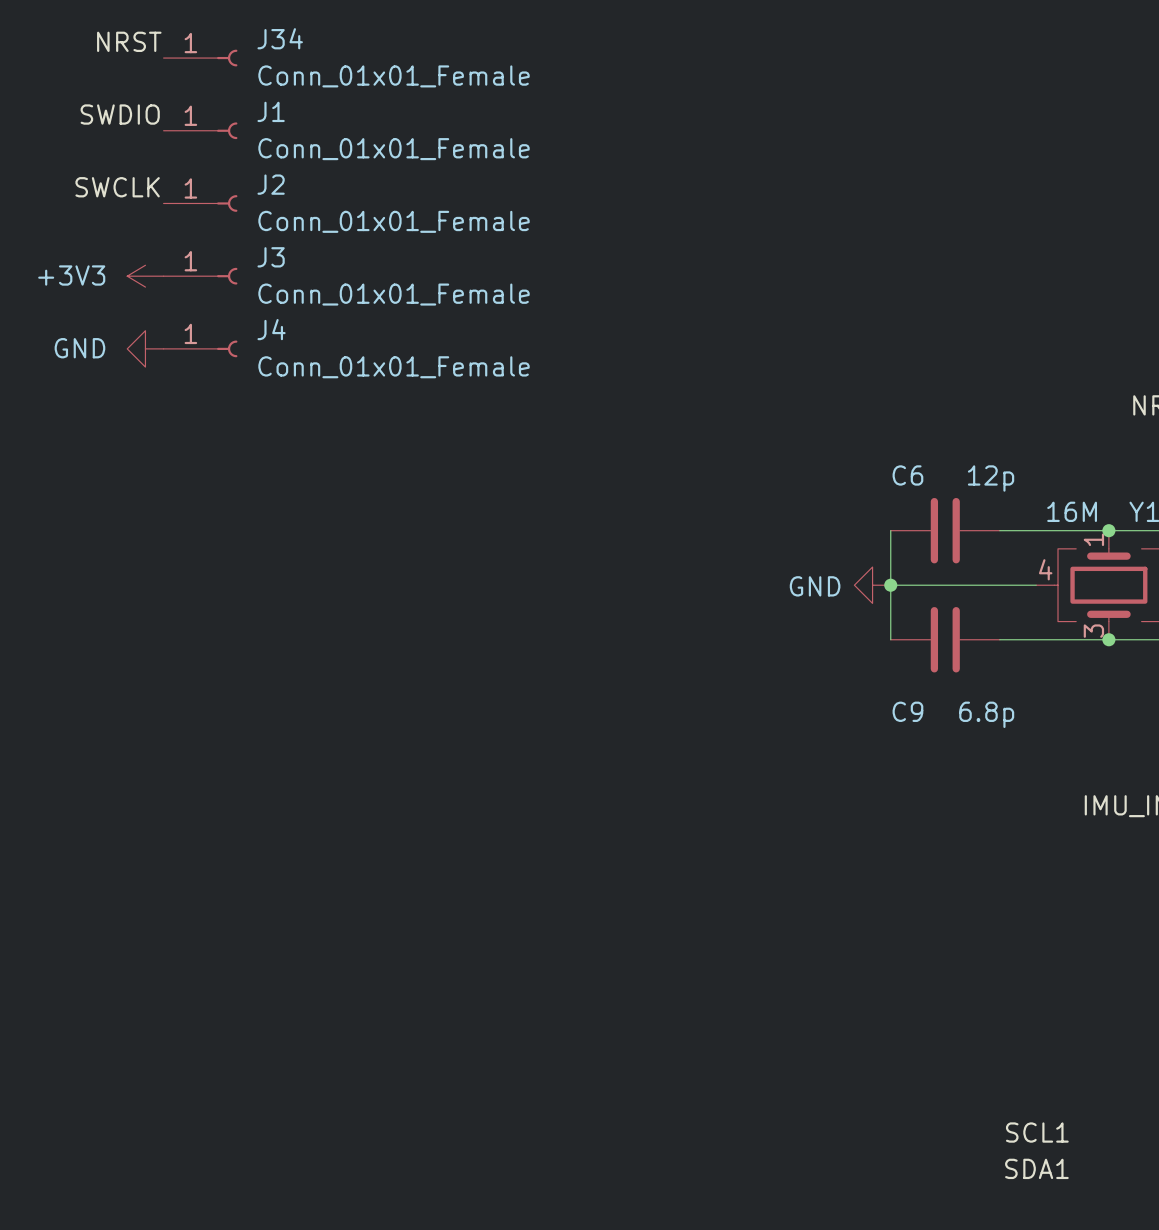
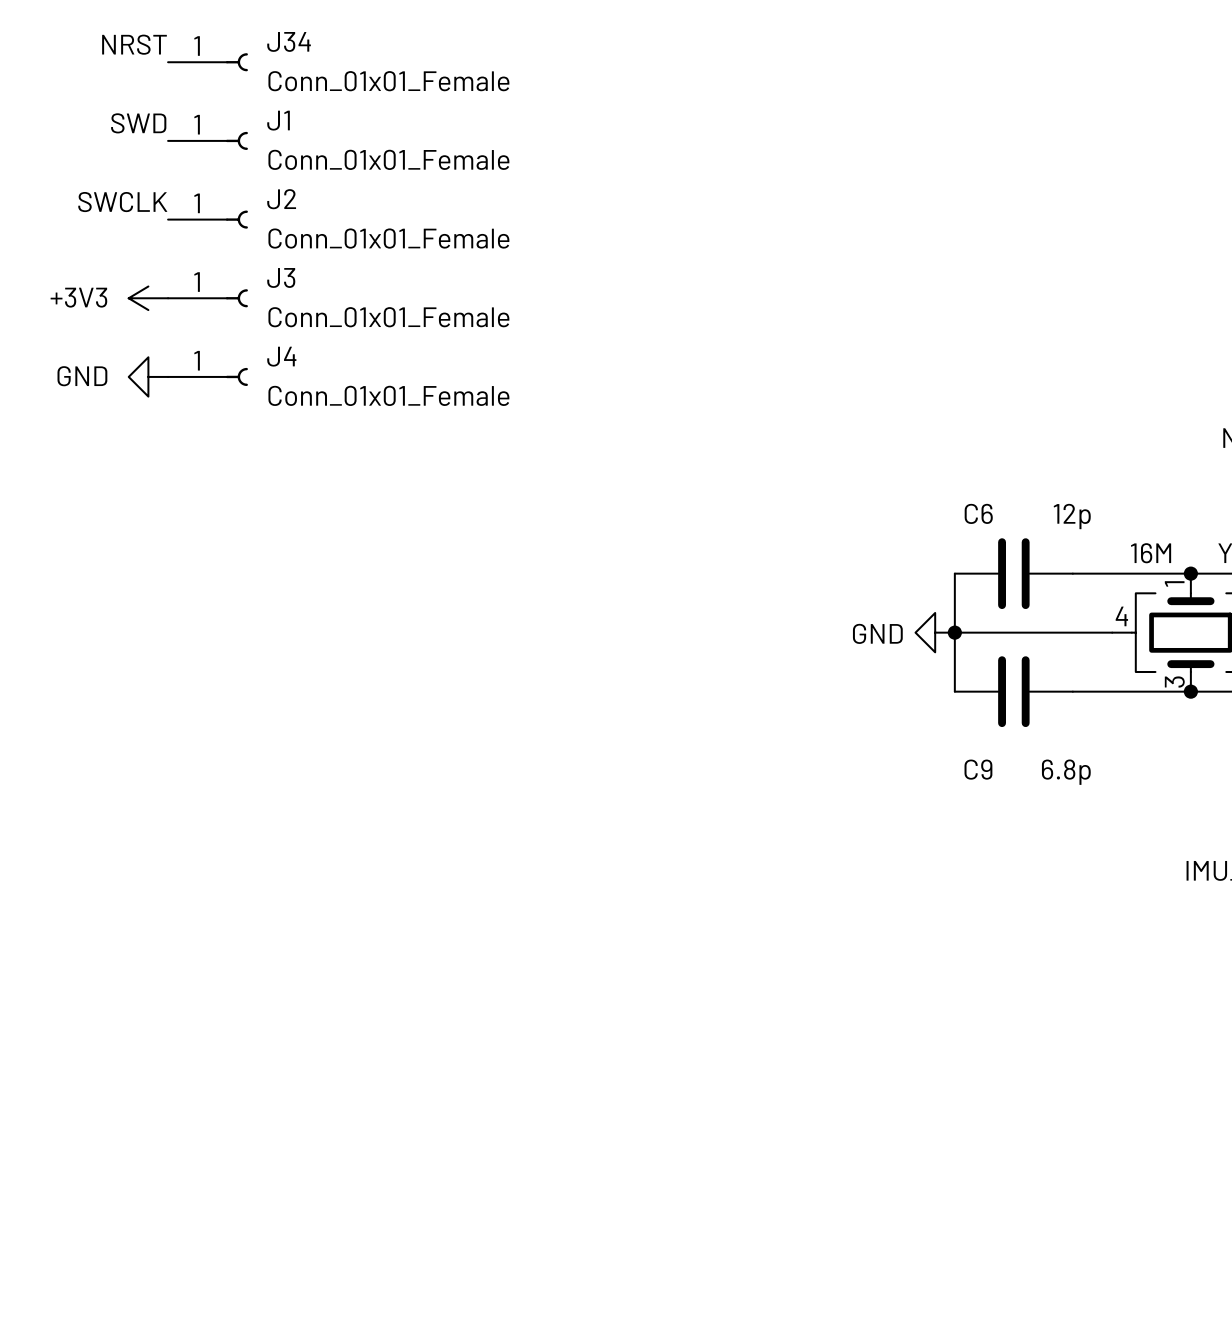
label: SWDIO (120, 114) -> SWD (138, 123)
label: SCL1 (1037, 1132) -> none
label: SDA1 (1036, 1168) -> none

